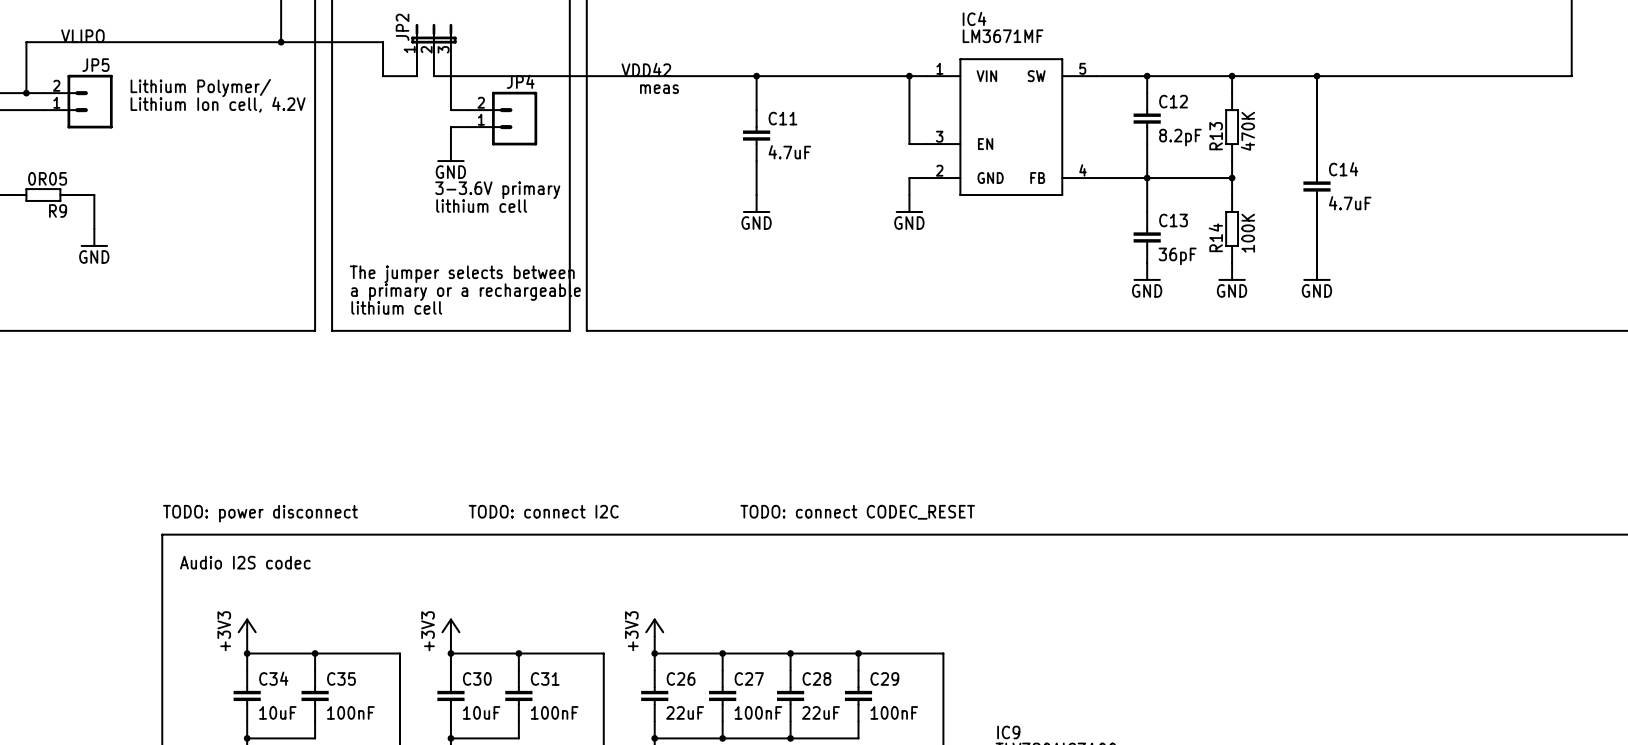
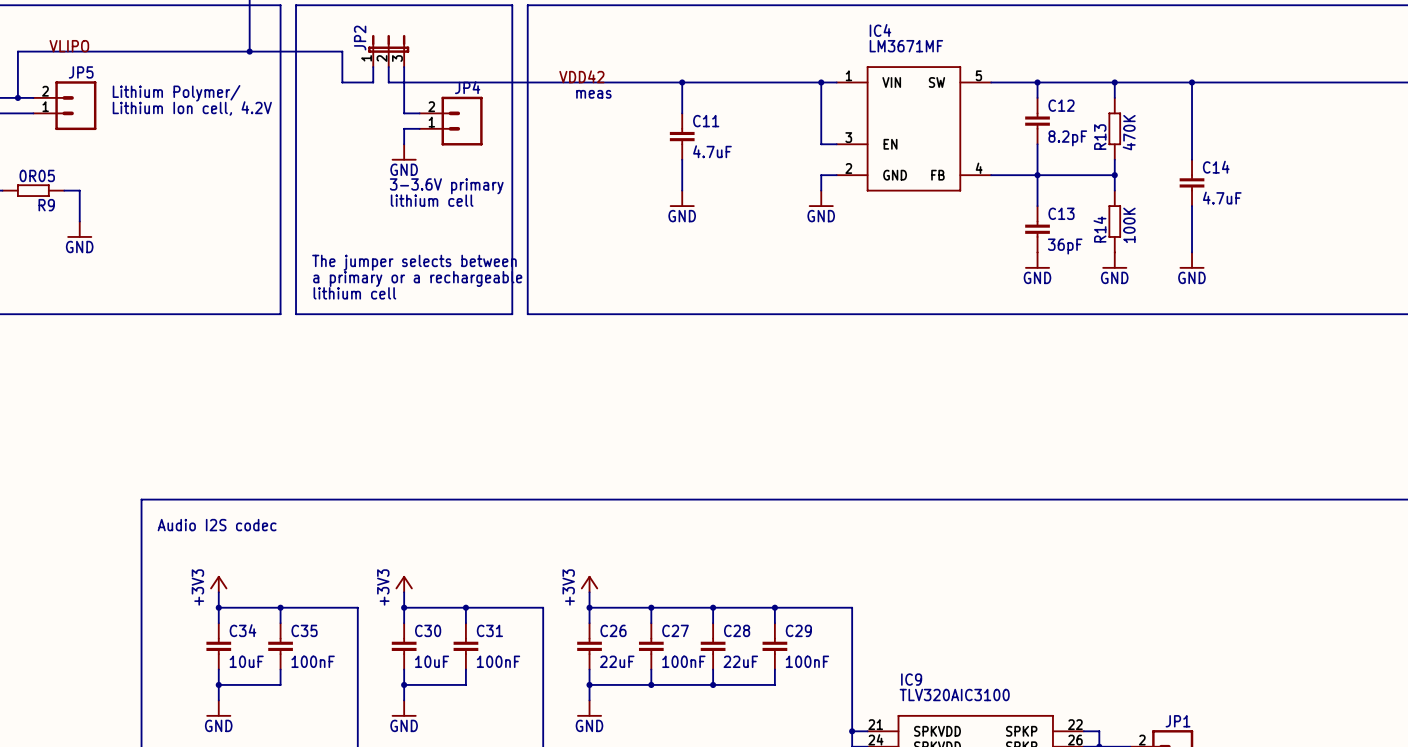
text: TODO: connect I2C (543, 511) -> none
text: TODO: connect CODEC_RESET (857, 512) -> none
text: TODO: power disconnect (260, 513) -> none

